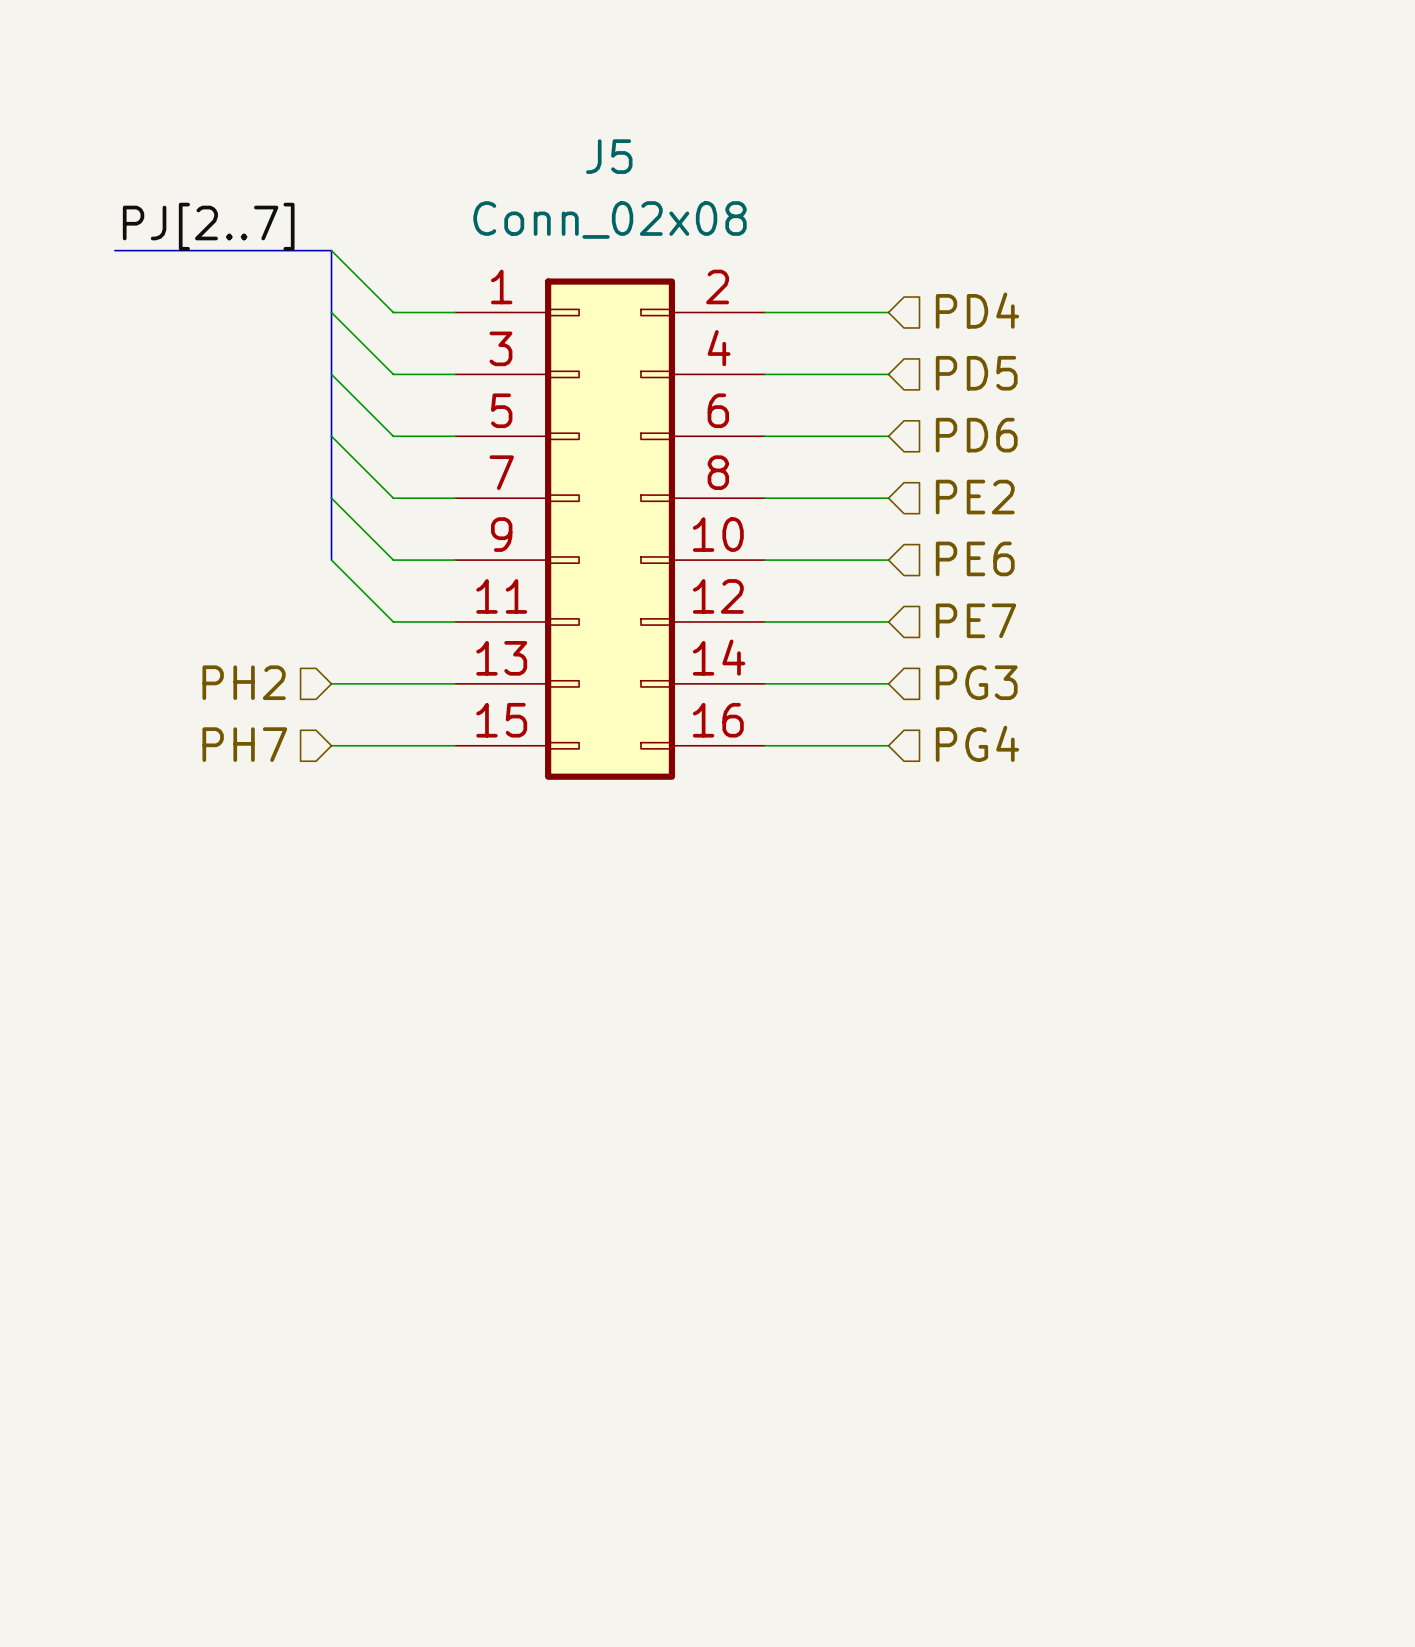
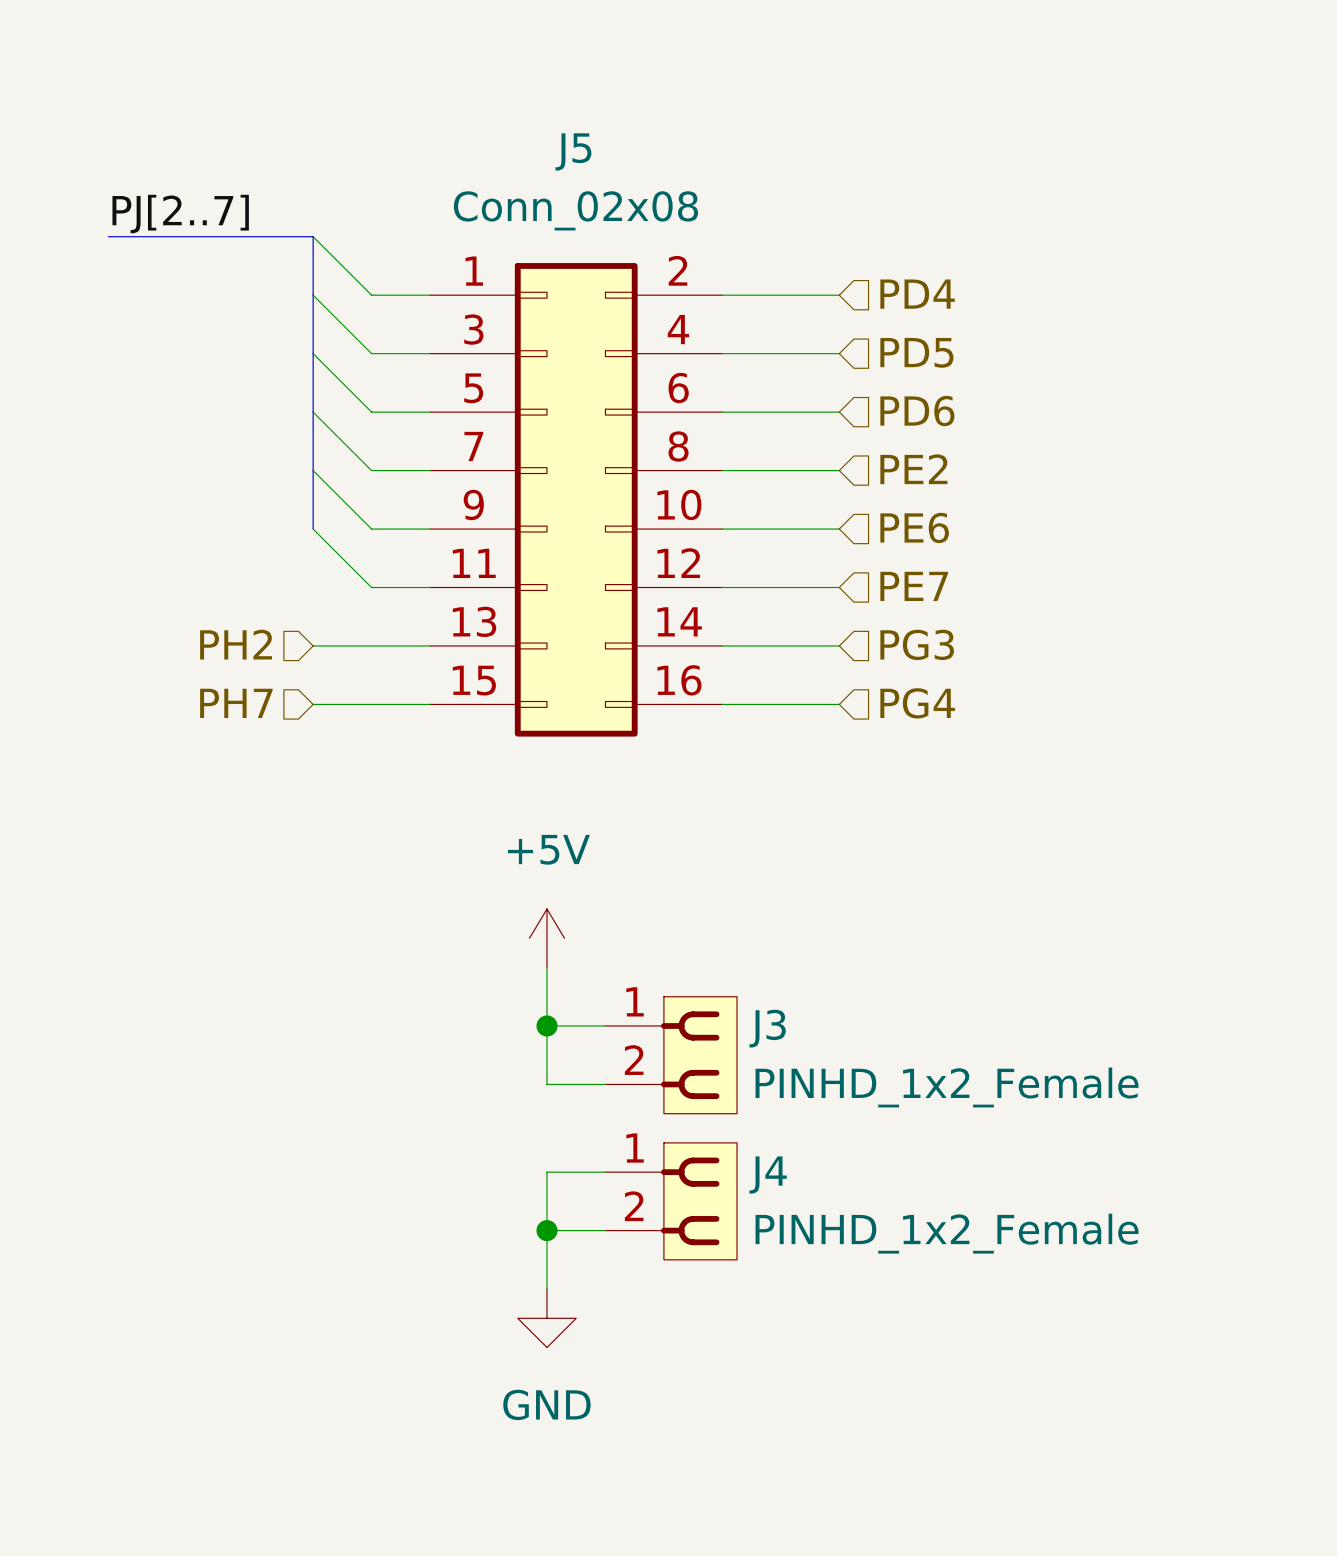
power symbol: none -> +5V (546, 938)
wire: none -> (546, 967) (546, 1084) (605, 1084)
wire: none -> (546, 1025) (605, 1025)
junction: none -> (546, 1025)
J3: none -> PINHD_1x2_Female (671, 1055)
wire: none -> (605, 1172) (546, 1172) (546, 1289)
J4: none -> PINHD_1x2_Female (671, 1201)
wire: none -> (546, 1230) (605, 1230)
junction: none -> (546, 1230)
power symbol: none -> GND (546, 1318)

